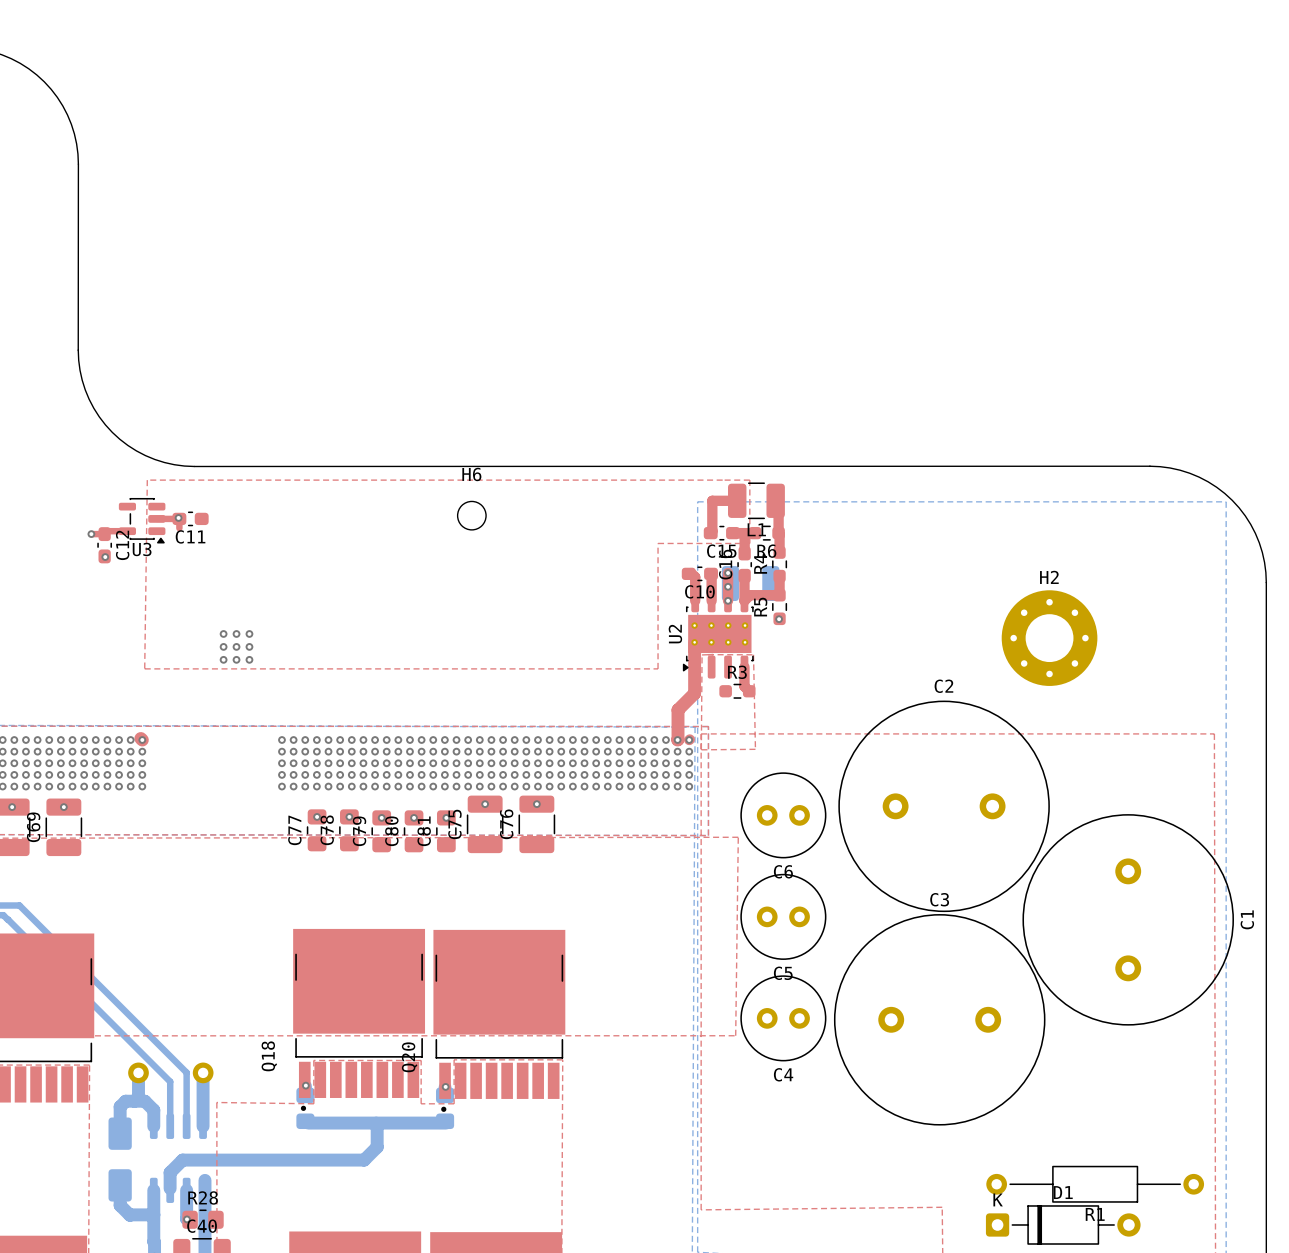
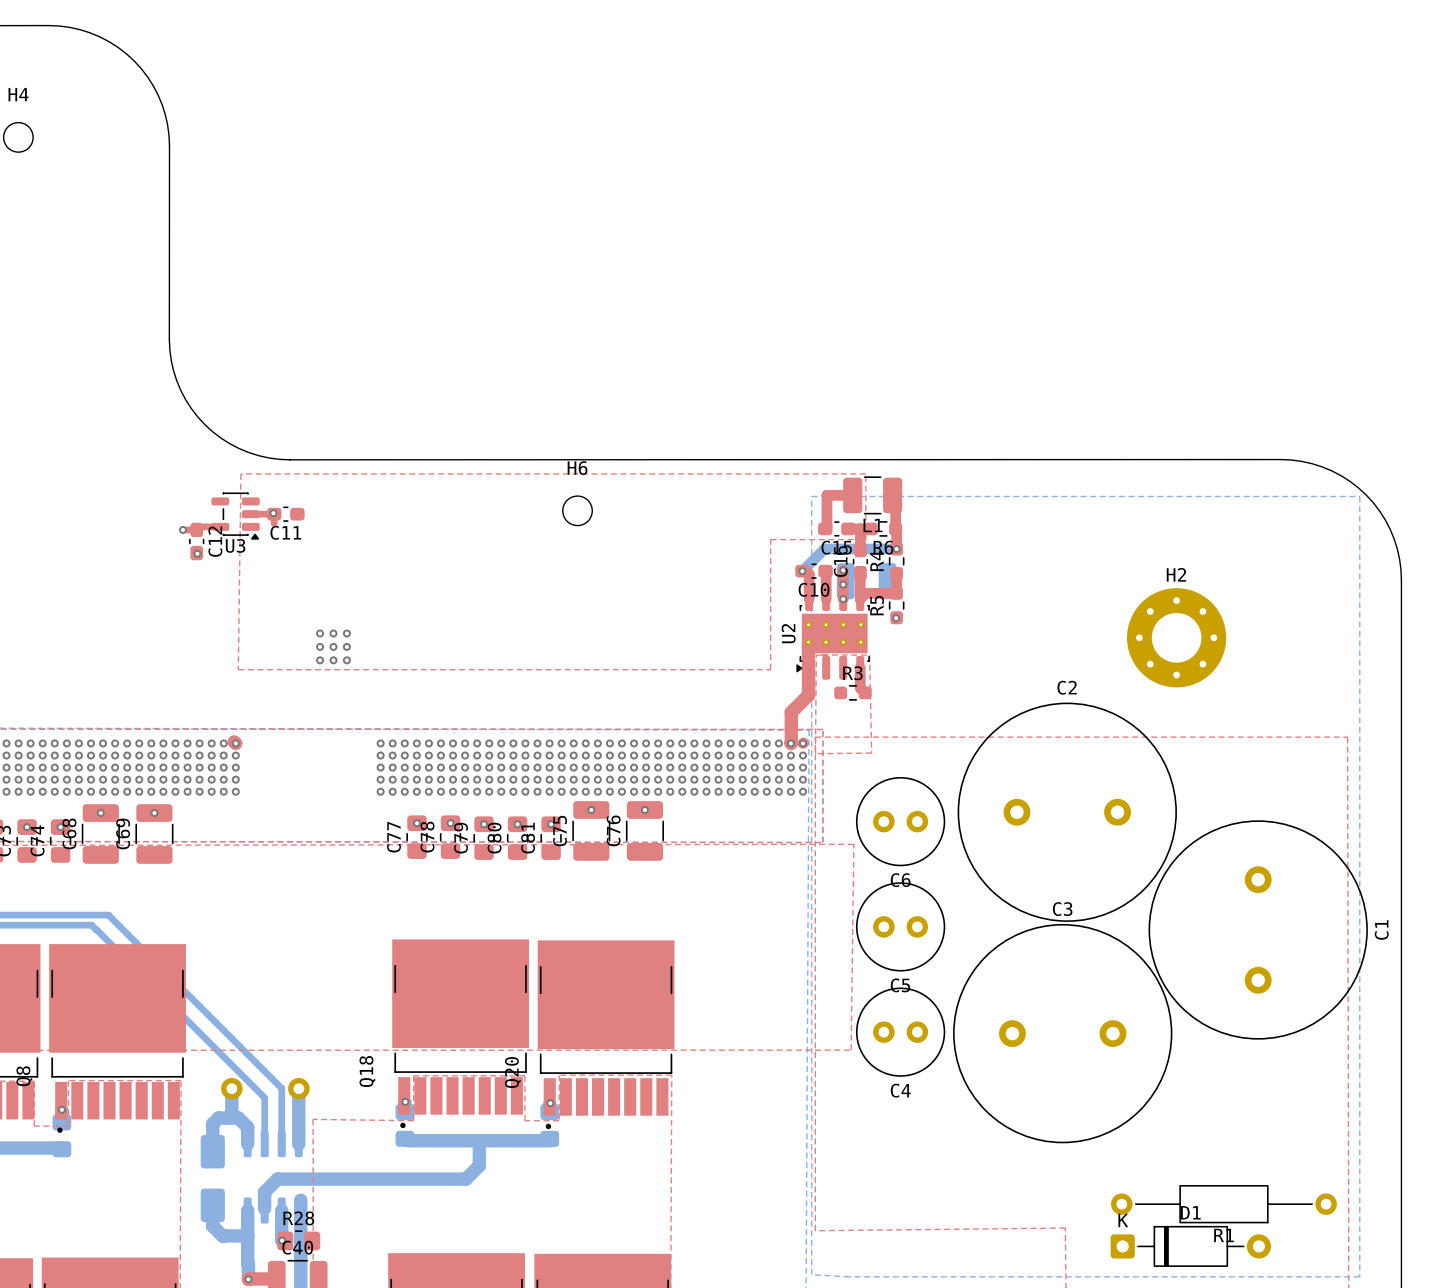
bottom track: none -> (896, 549) (824, 549) (802, 571)
via: none -> (896, 549)
via: none -> (802, 571)

